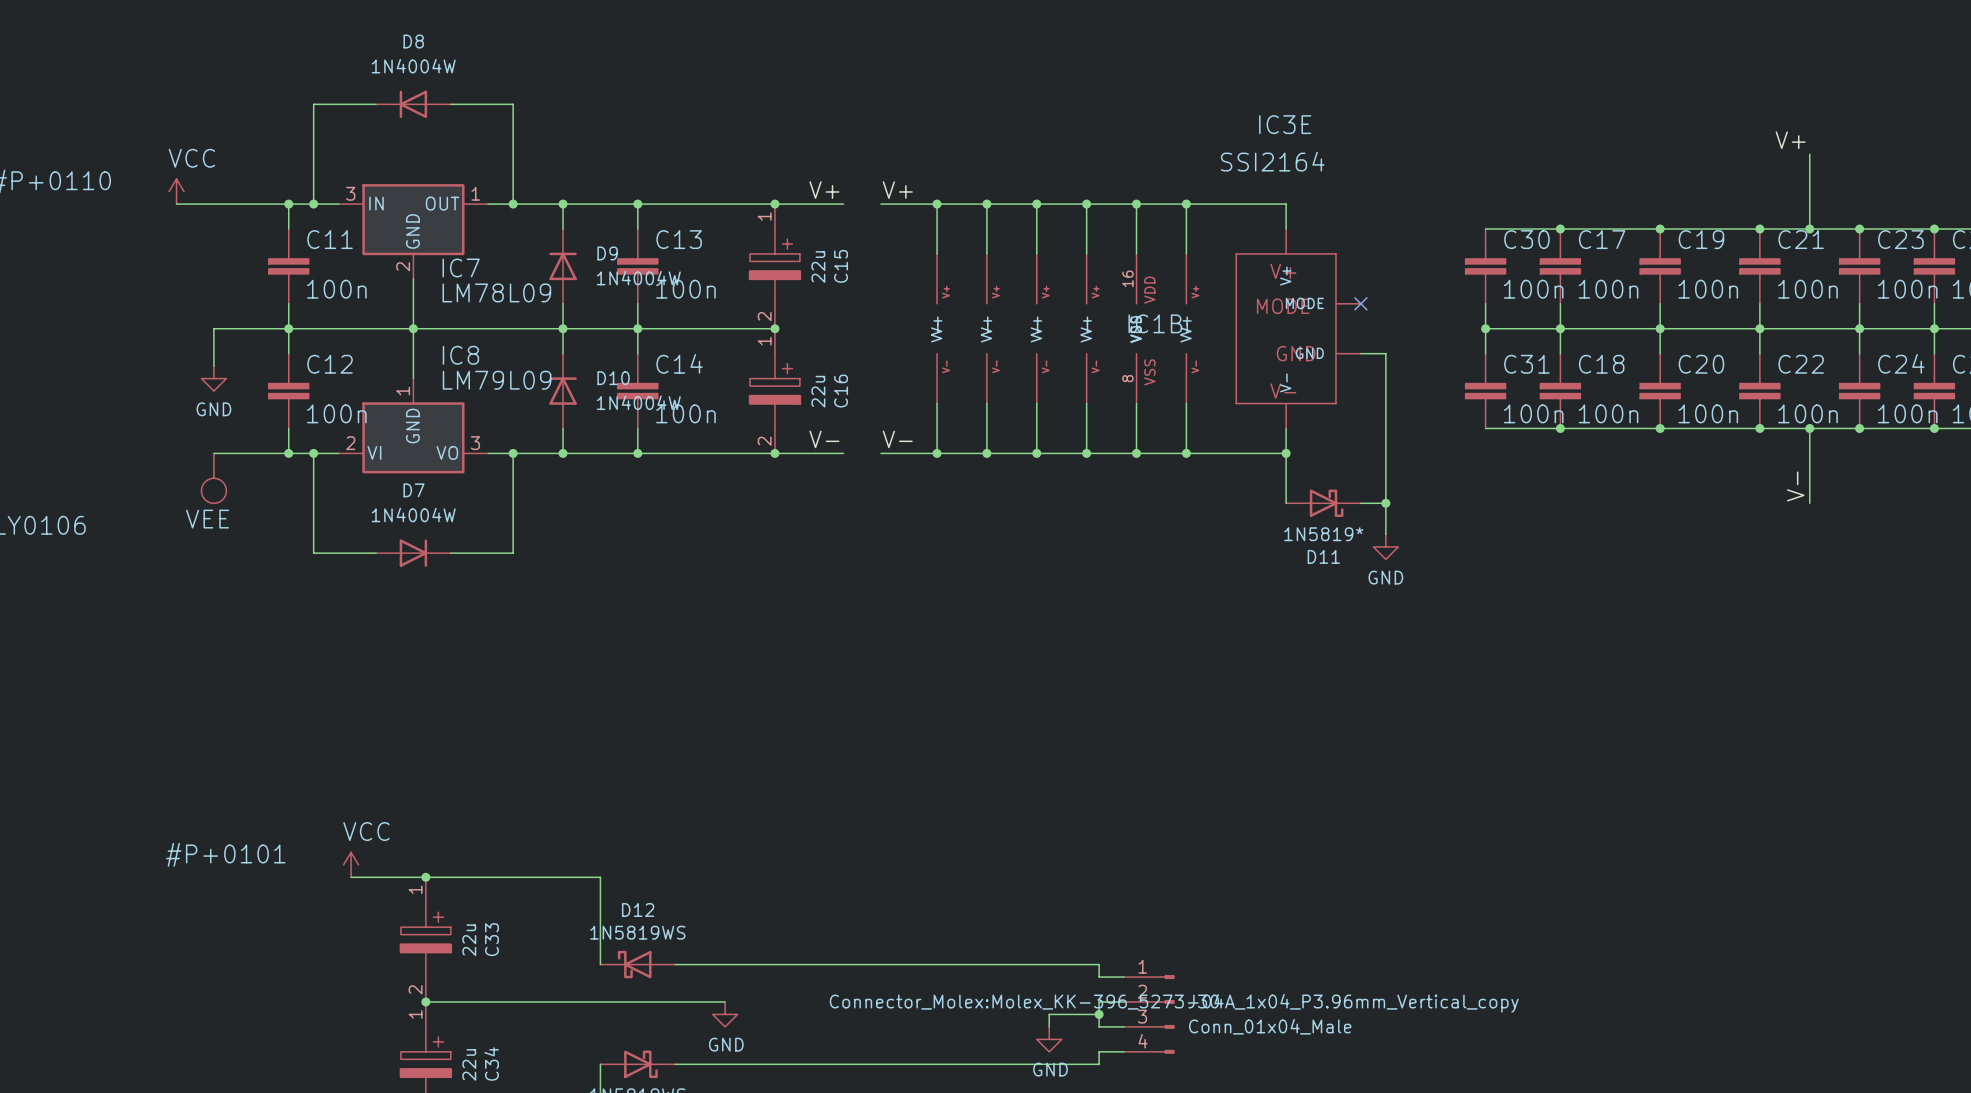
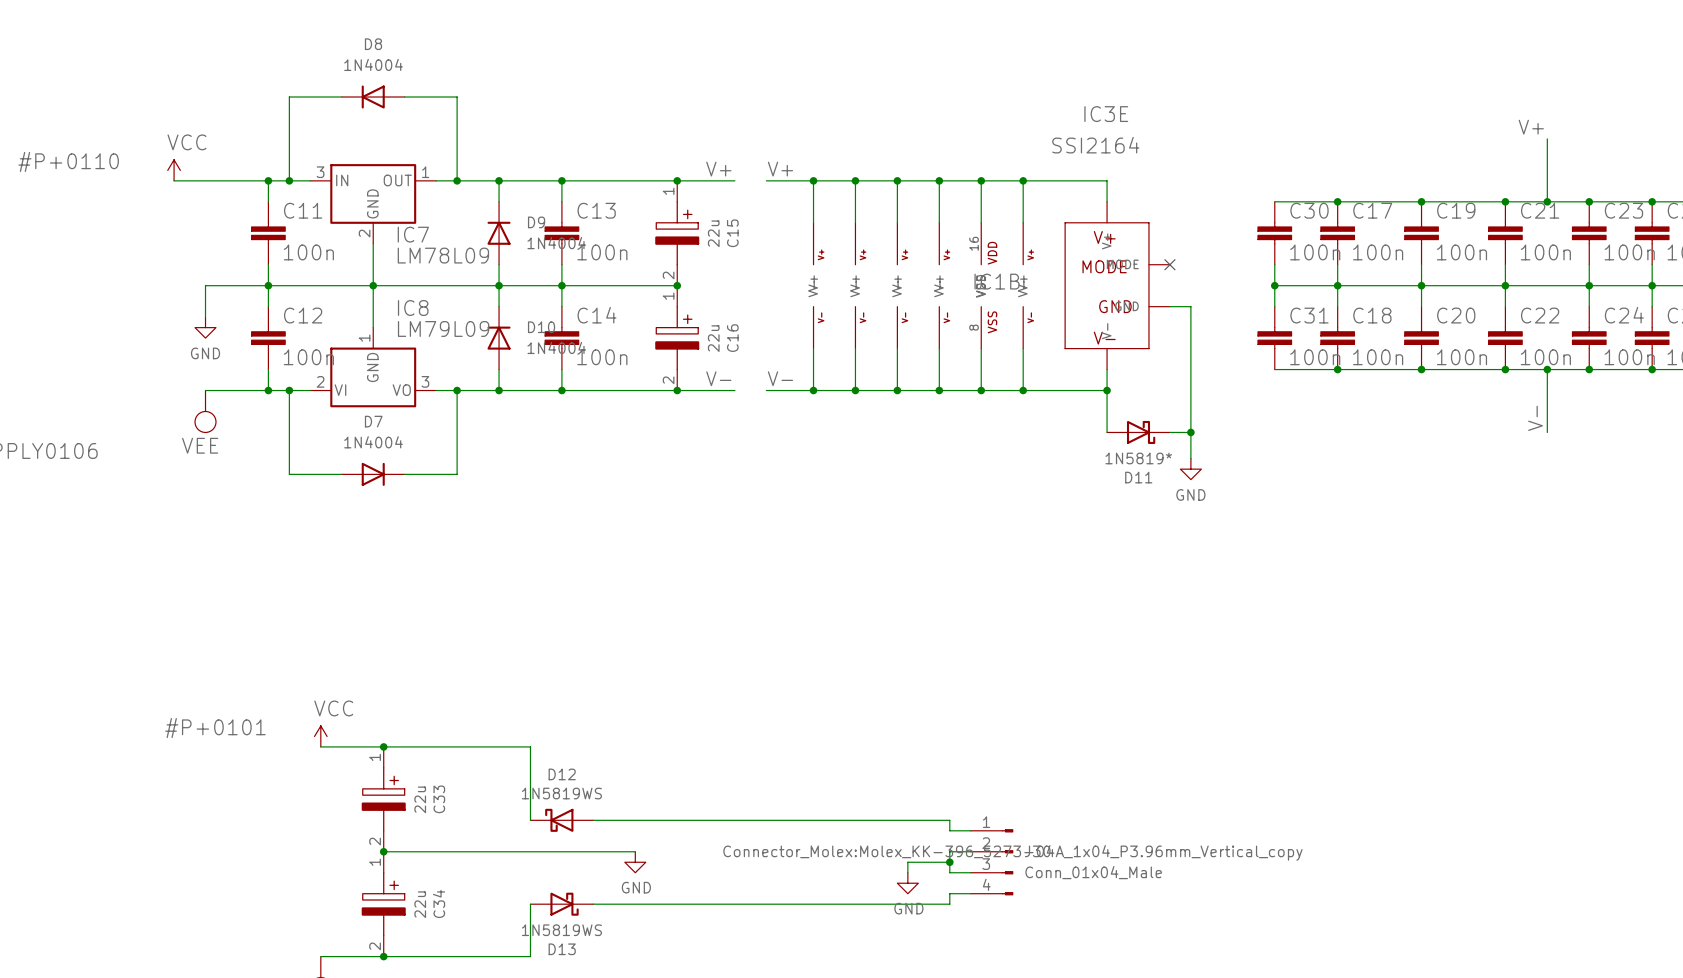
D8 value: 1N4004W (413, 66) -> 1N4004 (373, 64)
D9 value: 1N4004W (638, 278) -> 1N4004 (556, 243)
D10 value: 1N4004W (638, 402) -> 1N4004 (556, 347)
D7 value: 1N4004W (413, 514) -> 1N4004 (373, 442)

